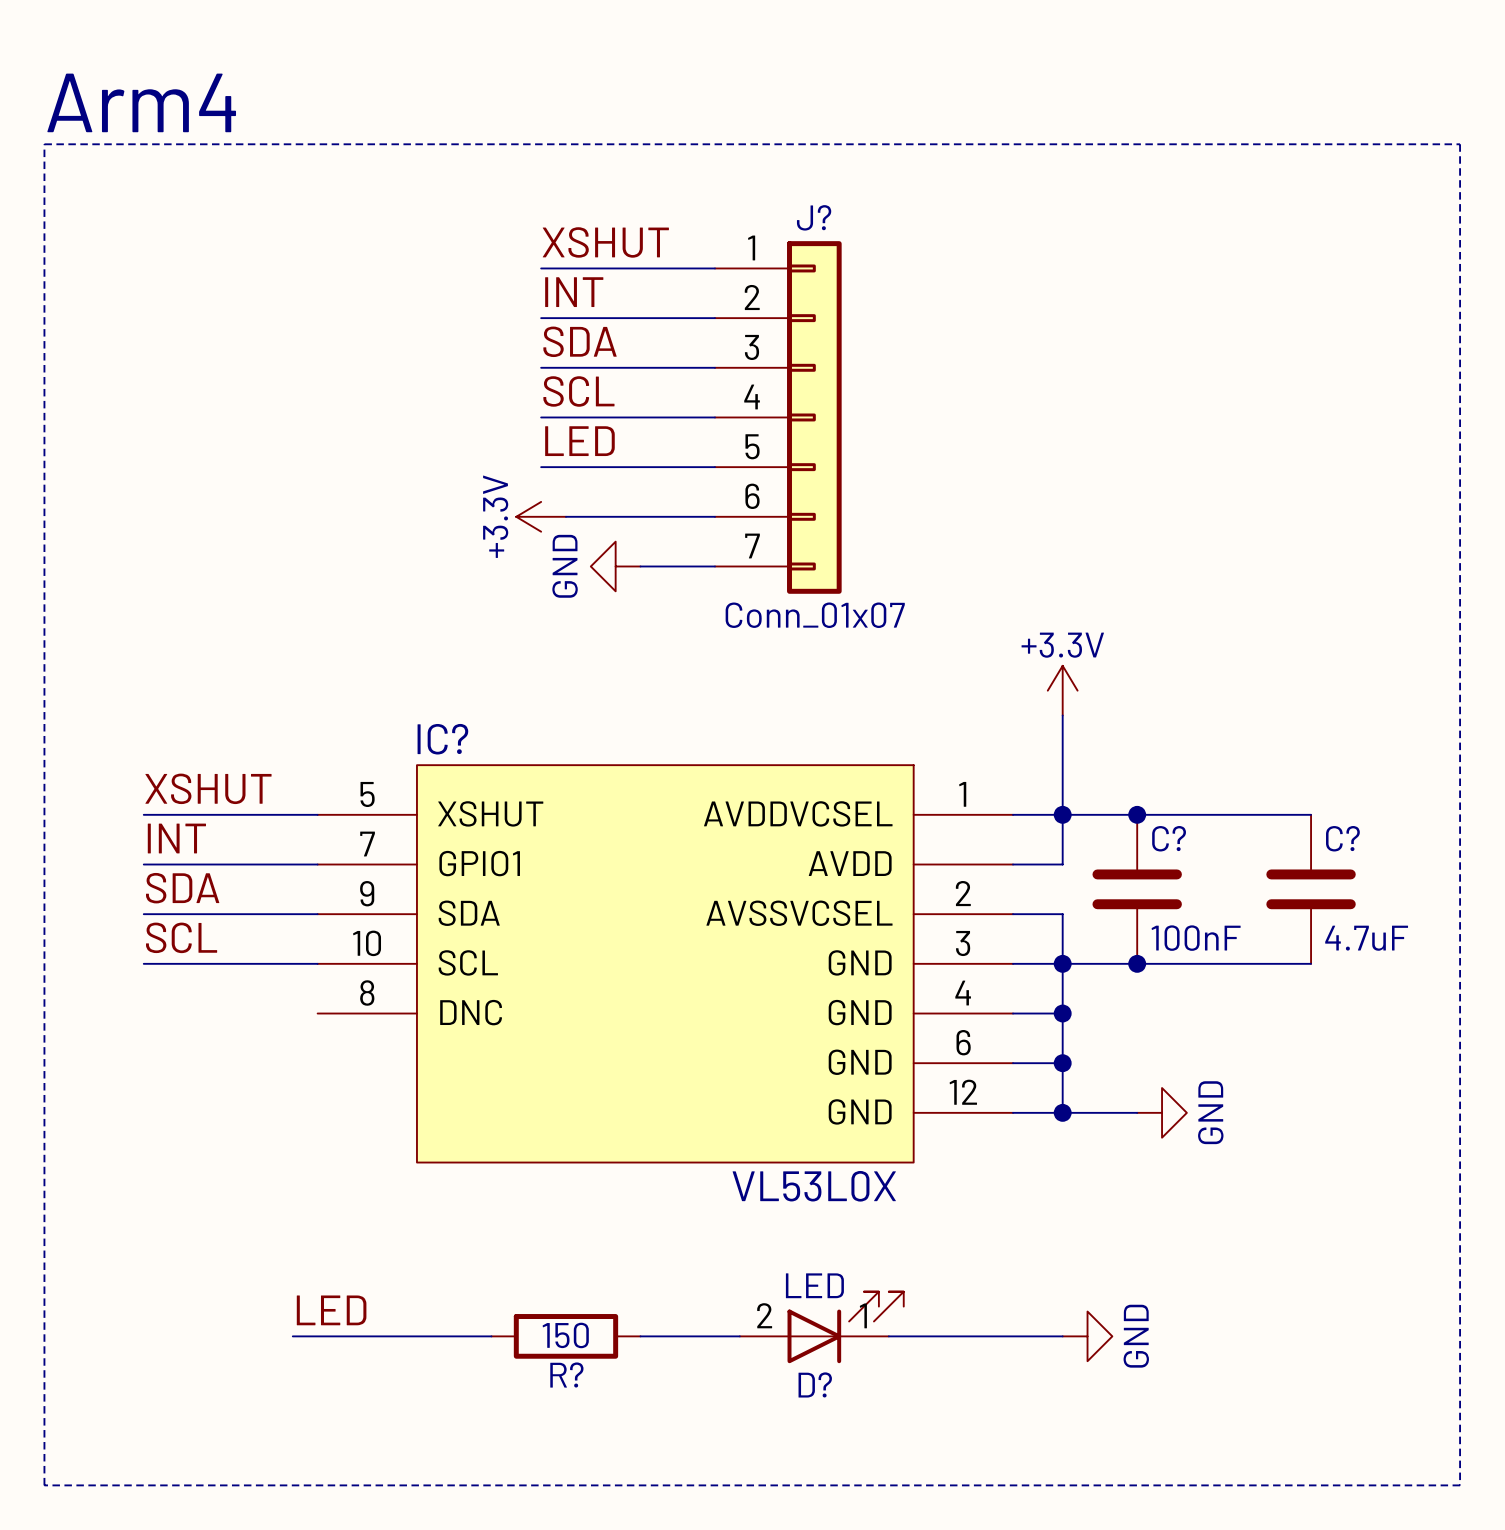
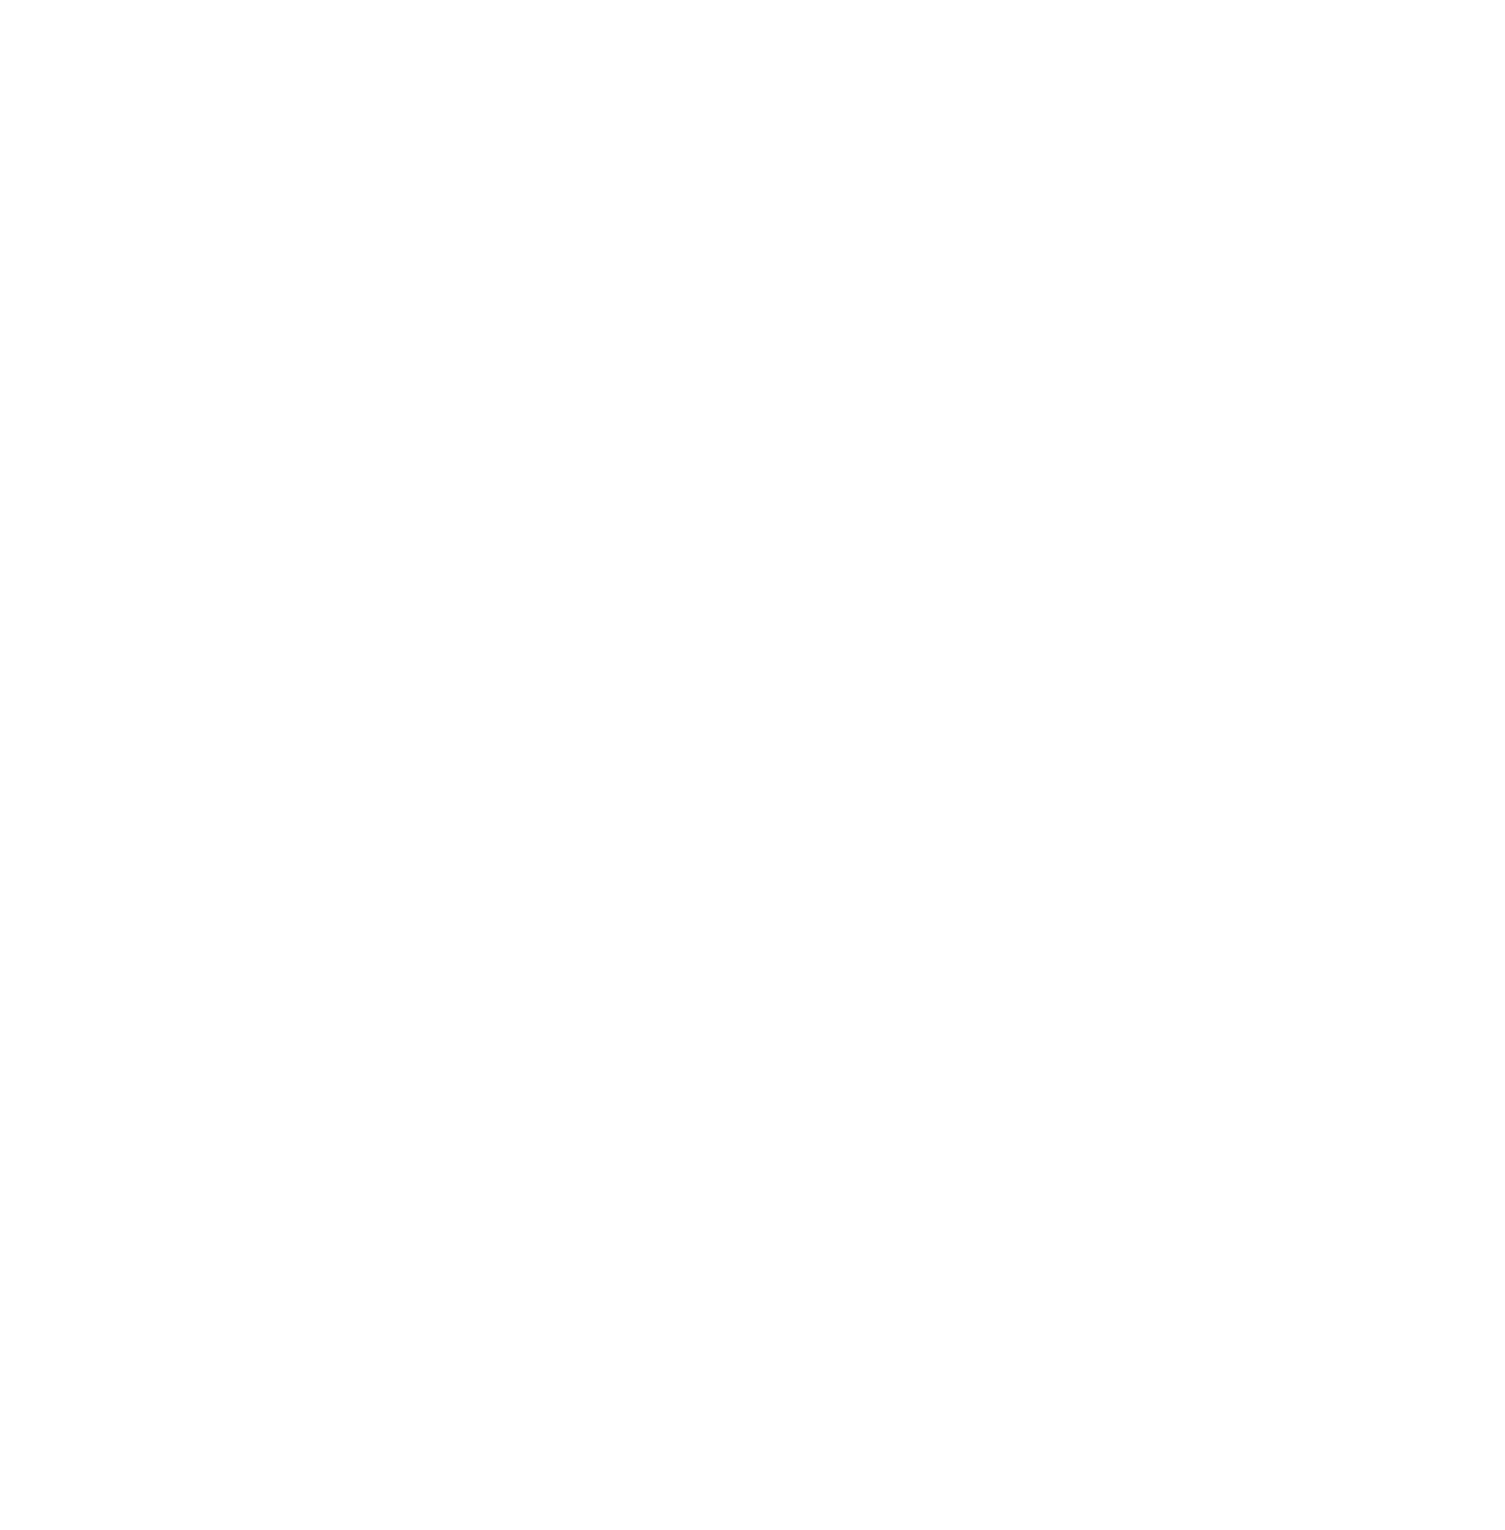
text: Arm4 (141, 102) -> none
line: (44, 144) (44, 1485) (1460, 1485) (1460, 144) (44, 144) -> none
label: XSHUT (605, 242) -> none
wire: (541, 268) (714, 268) -> none
label: INT (574, 292) -> none
wire: (541, 318) (714, 318) -> none
label: SDA (580, 341) -> none
wire: (541, 367) (714, 367) -> none
label: SCL (578, 391) -> none
wire: (541, 417) (714, 417) -> none
J?: Conn_01x07 (778, 417) -> none
label: LED (579, 441) -> none
wire: (541, 467) (714, 467) -> none
power symbol: +3.3V (541, 516) -> none
wire: (565, 516) (714, 516) -> none
power symbol: GND (615, 566) -> none
wire: (640, 566) (714, 566) -> none
power symbol: +3.3V (1062, 690) -> none
wire: (1062, 715) (1062, 864) (1013, 864) -> none
label: XSHUT (208, 788) -> none
wire: (143, 814) (317, 814) -> none
wire: (1013, 814) (1311, 814) -> none
junction: (1062, 814) -> none
junction: (1137, 814) -> none
label: INT (176, 838) -> none
wire: (143, 864) (317, 864) -> none
label: SDA (182, 888) -> none
C?: 100nF (1137, 889) -> none
C?: 4.7uF (1311, 889) -> none
wire: (143, 914) (317, 914) -> none
wire: (1013, 914) (1062, 914) (1062, 1112) -> none
label: SCL (181, 937) -> none
wire: (143, 963) (317, 963) -> none
IC?: VL53L0X (665, 963) -> none
wire: (1013, 963) (1311, 963) -> none
junction: (1062, 963) -> none
junction: (1137, 963) -> none
wire: (1013, 1013) (1062, 1013) -> none
junction: (1062, 1013) -> none
wire: (1013, 1063) (1062, 1063) -> none
junction: (1062, 1063) -> none
wire: (1013, 1112) (1137, 1112) -> none
junction: (1062, 1112) -> none
power symbol: GND (1162, 1112) -> none
label: LED (331, 1310) -> none
D?: LED (821, 1327) -> none
wire: (292, 1336) (491, 1336) -> none
R?: 150 (565, 1336) -> none
wire: (640, 1336) (739, 1336) -> none
wire: (888, 1336) (1062, 1336) -> none
power symbol: GND (1087, 1336) -> none

